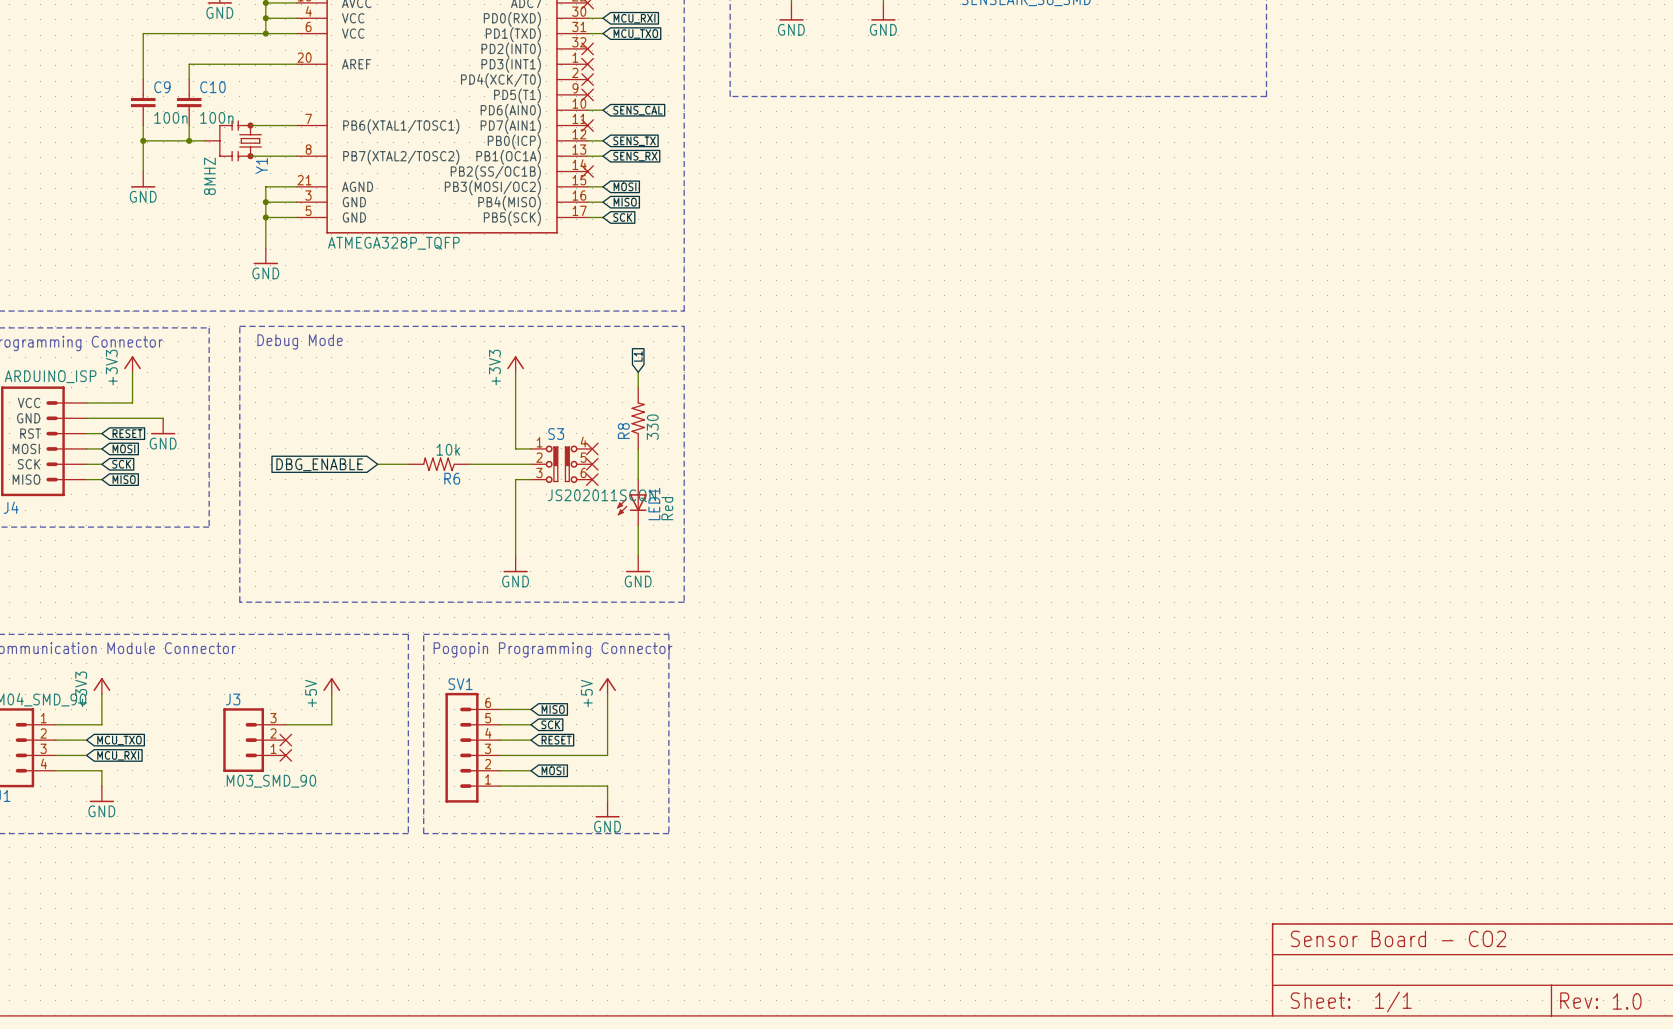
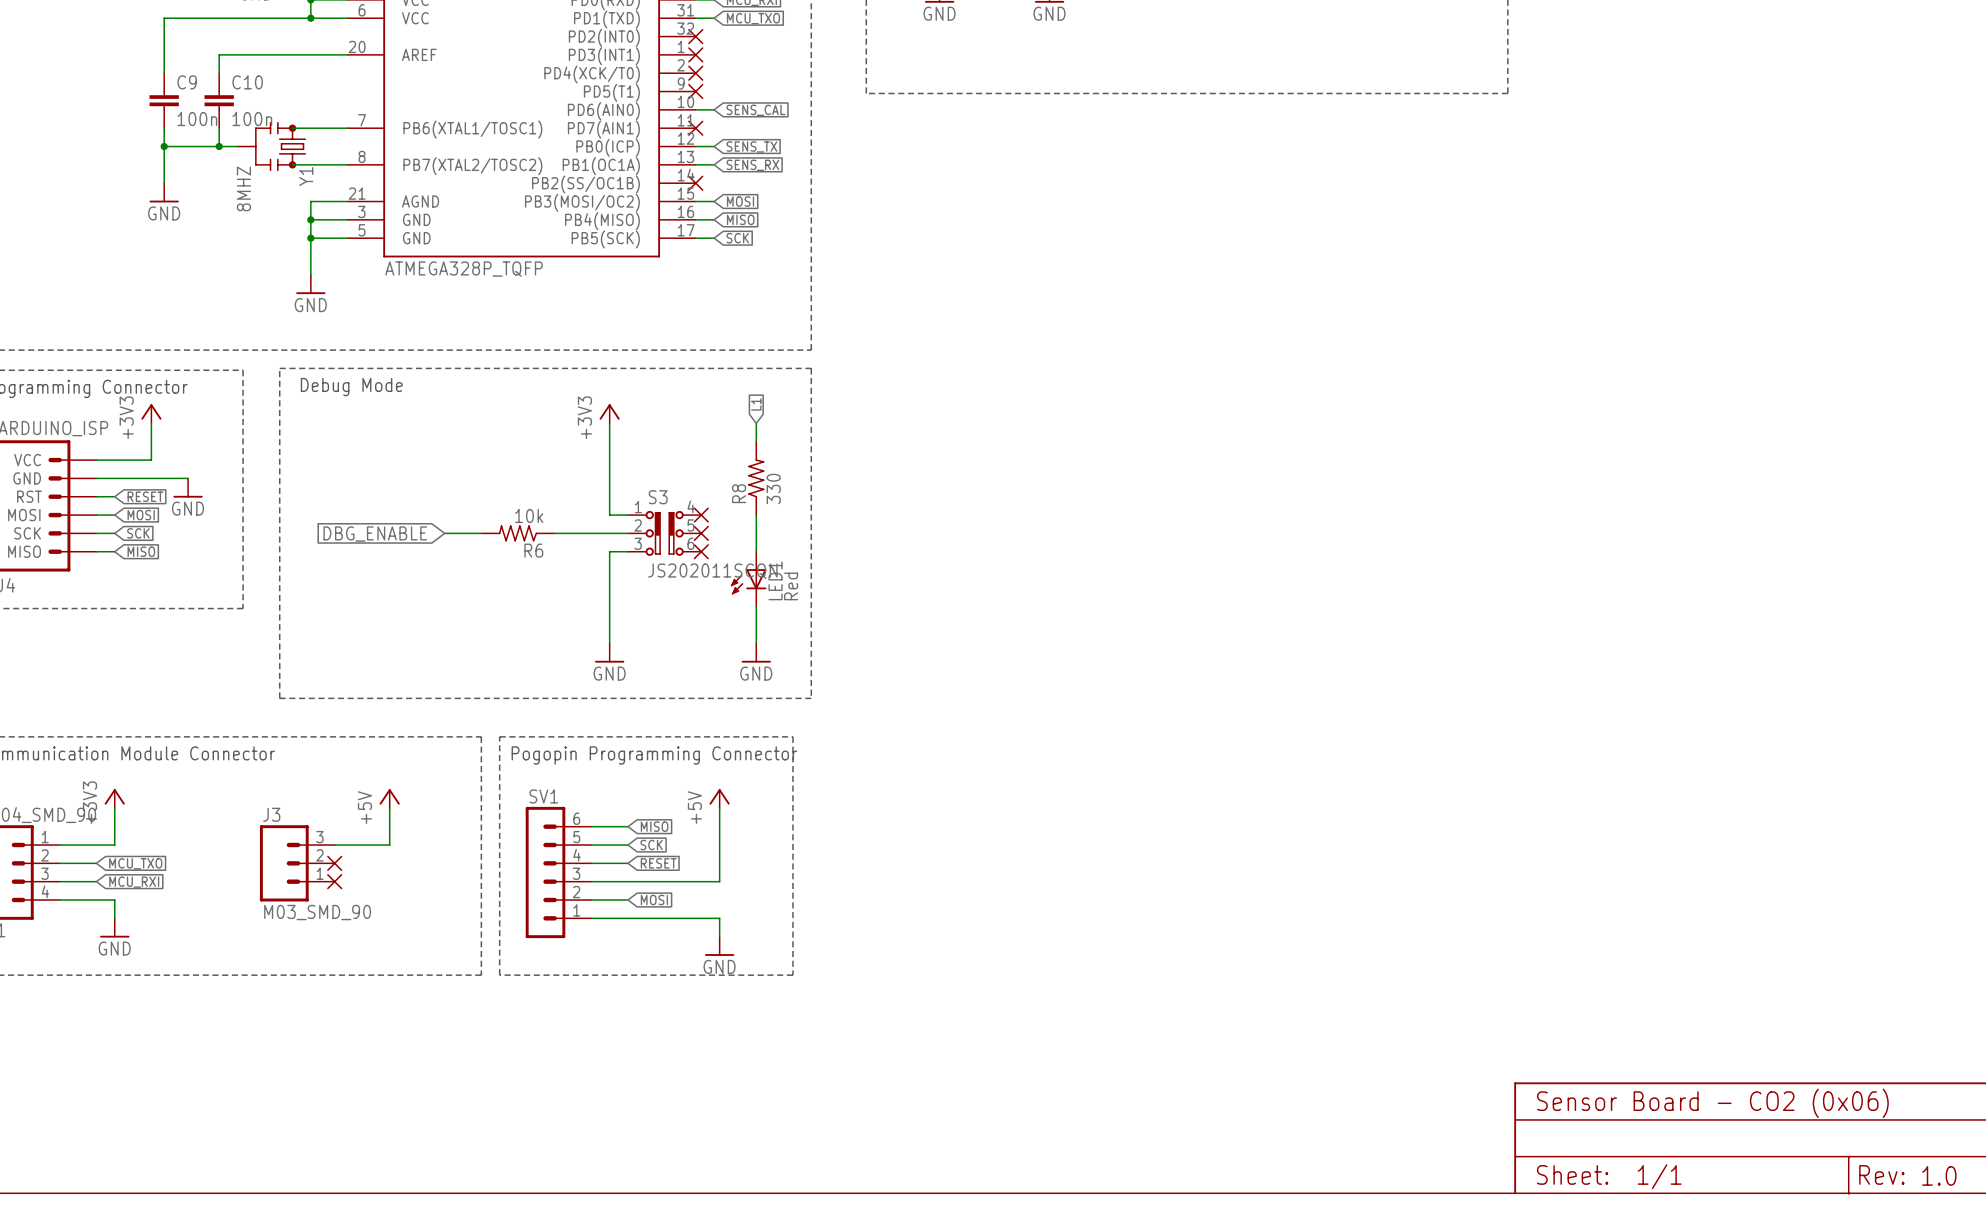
text: Sensor Board - CO2 (1398, 938) -> Sensor Board - CO2 (0x06) (1712, 1103)

